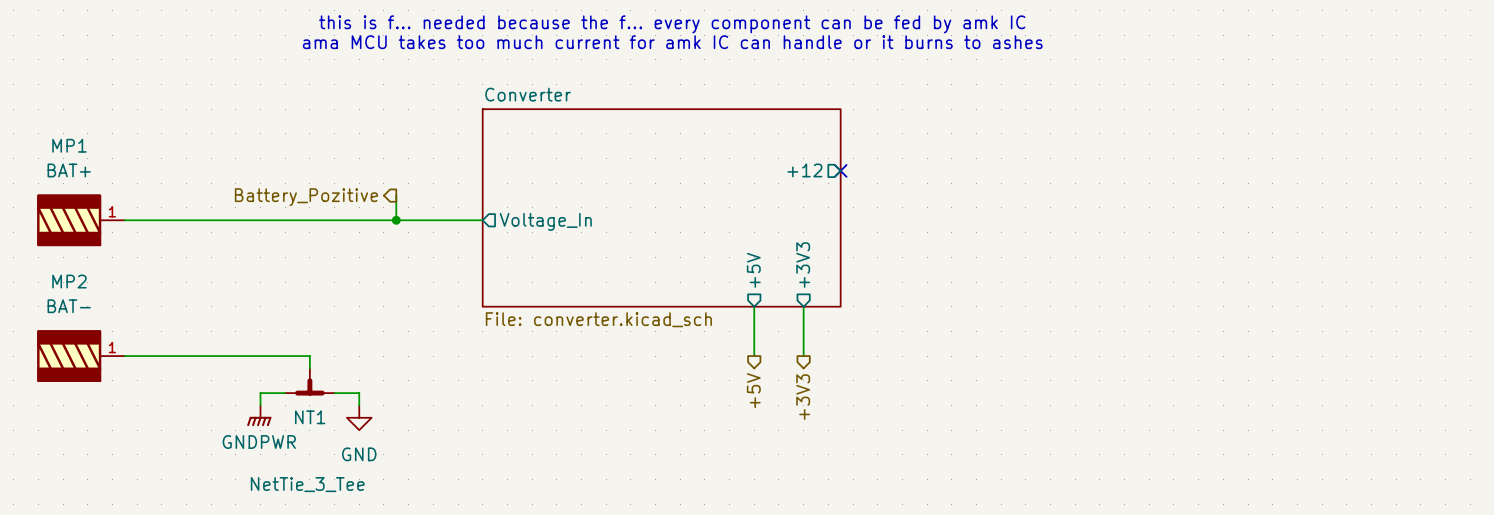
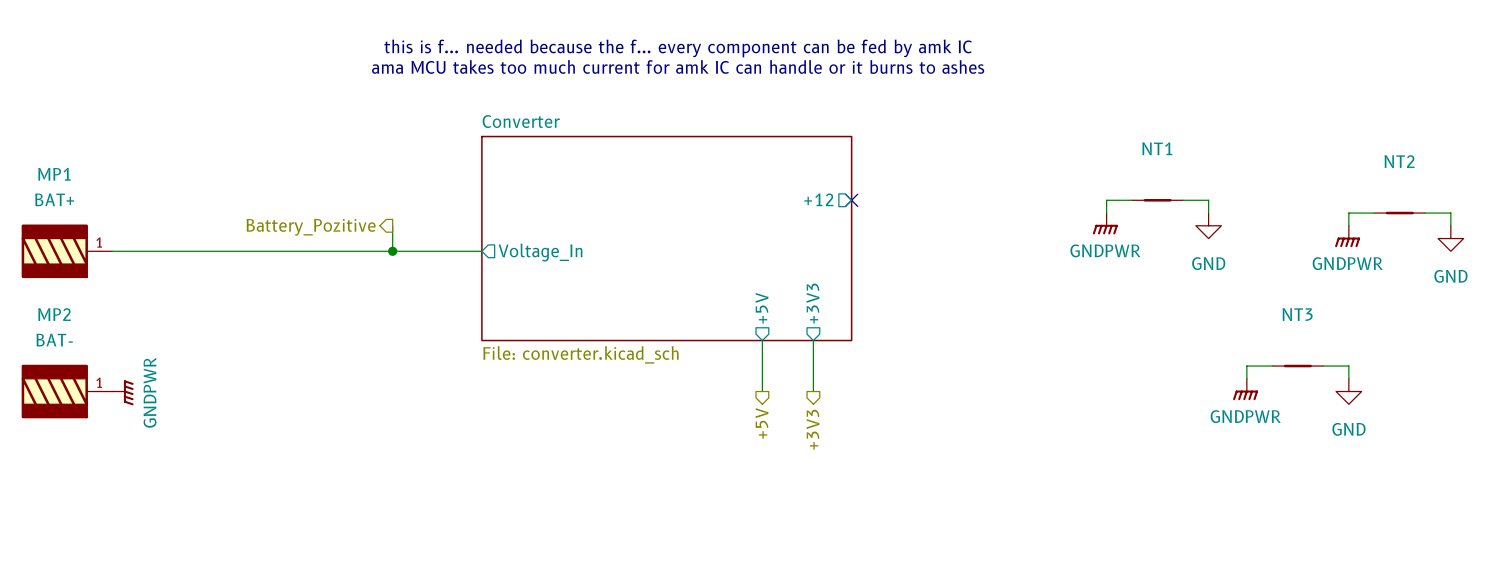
wire: none -> (1132, 200) (1106, 200) (1106, 213)
wire: none -> (1183, 200) (1208, 200) (1208, 213)
wire: none -> (1374, 213) (1348, 213) (1348, 225)
NT2: none -> (1399, 213)
wire: none -> (1425, 213) (1450, 213) (1450, 225)
power symbol: none -> GNDPWR (1105, 223)
power symbol: none -> GND (1208, 225)
power symbol: none -> GNDPWR (1347, 236)
power symbol: none -> GND (1450, 238)
wire: none -> (1272, 366) (1246, 366) (1246, 378)
NT3: none -> (1297, 366)
wire: none -> (1323, 366) (1348, 366) (1348, 378)
power symbol: none -> GNDPWR (1245, 389)
wire: (124, 356) (309, 356) (309, 368) -> none
power symbol: none -> GND (1348, 391)
NT1 symbol: [285, 367, 335, 396] -> [1132, 199, 1184, 202]
wire: (285, 393) (260, 393) (260, 405) -> none
wire: (334, 393) (359, 393) (359, 405) -> none
power symbol rotation: 0° (259, 415) -> 90° counterclockwise (122, 392)
power symbol position: GNDPWR (259, 415) -> GNDPWR (122, 392)
NT1 name position: NT1 (310, 417) -> NT1 (1157, 148)
power symbol: GND (359, 417) -> none
NT1 value: NetTie_3_Tee (307, 484) -> none

